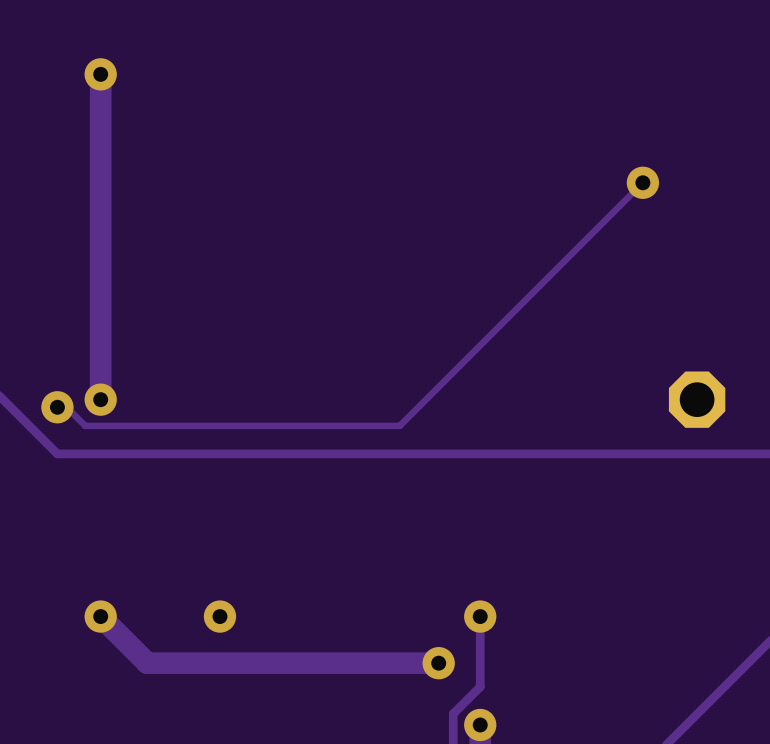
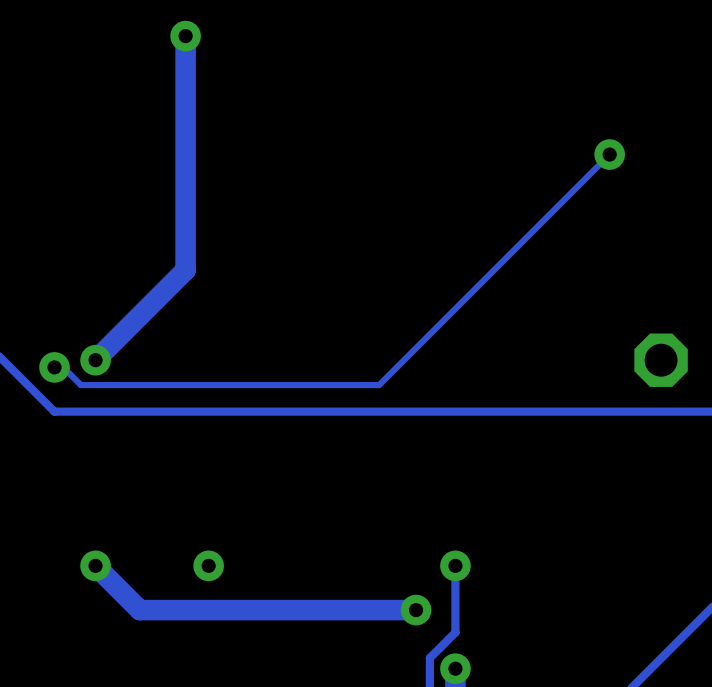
track: (100, 74) (100, 399) -> (185, 36) (185, 270) (95, 360)
via position: (100, 74) -> (185, 36)

